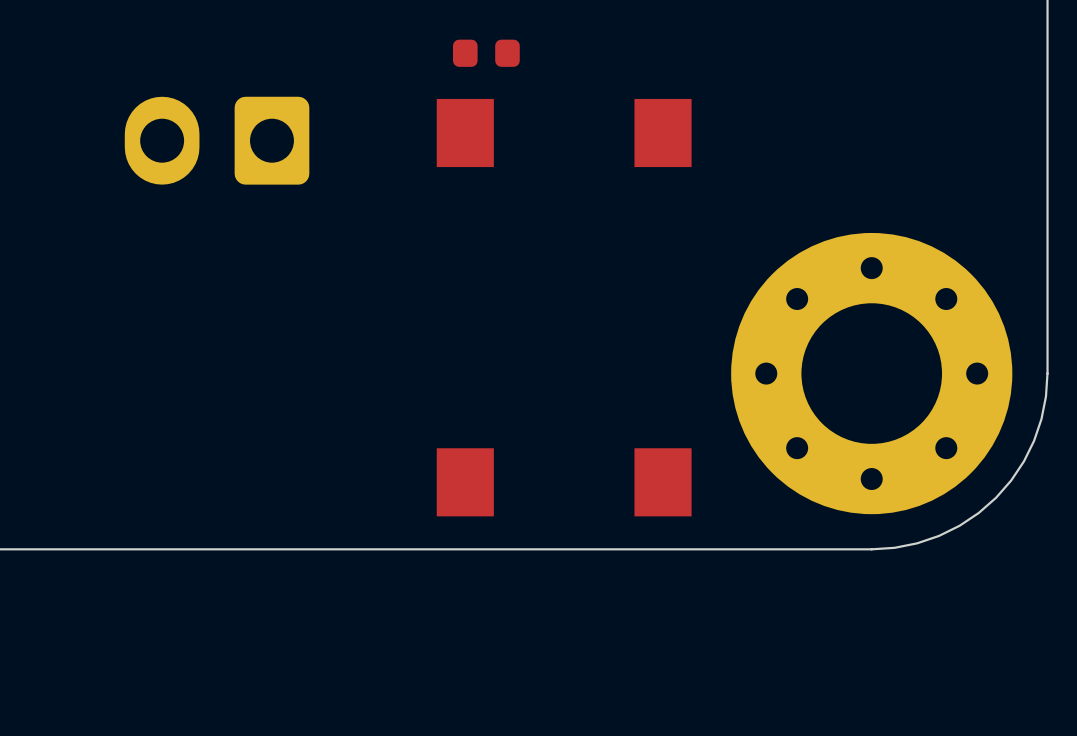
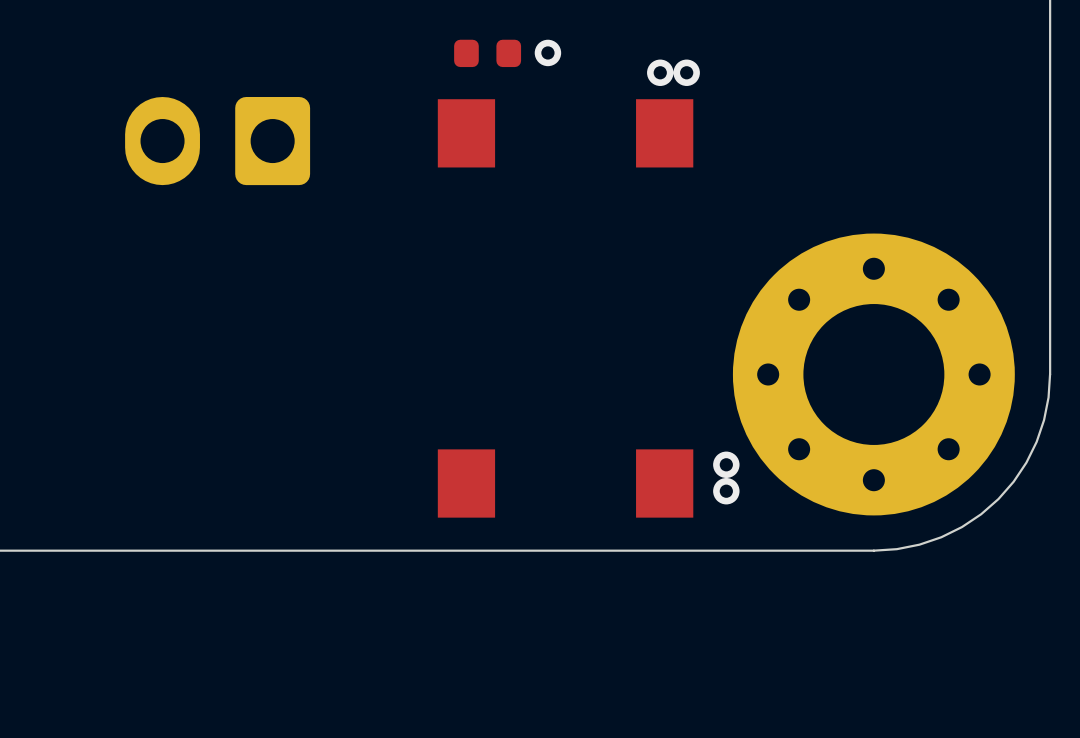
via: none -> (547, 52)
via: none -> (660, 72)
via: none -> (686, 72)
via: none -> (726, 464)
via: none -> (726, 491)

